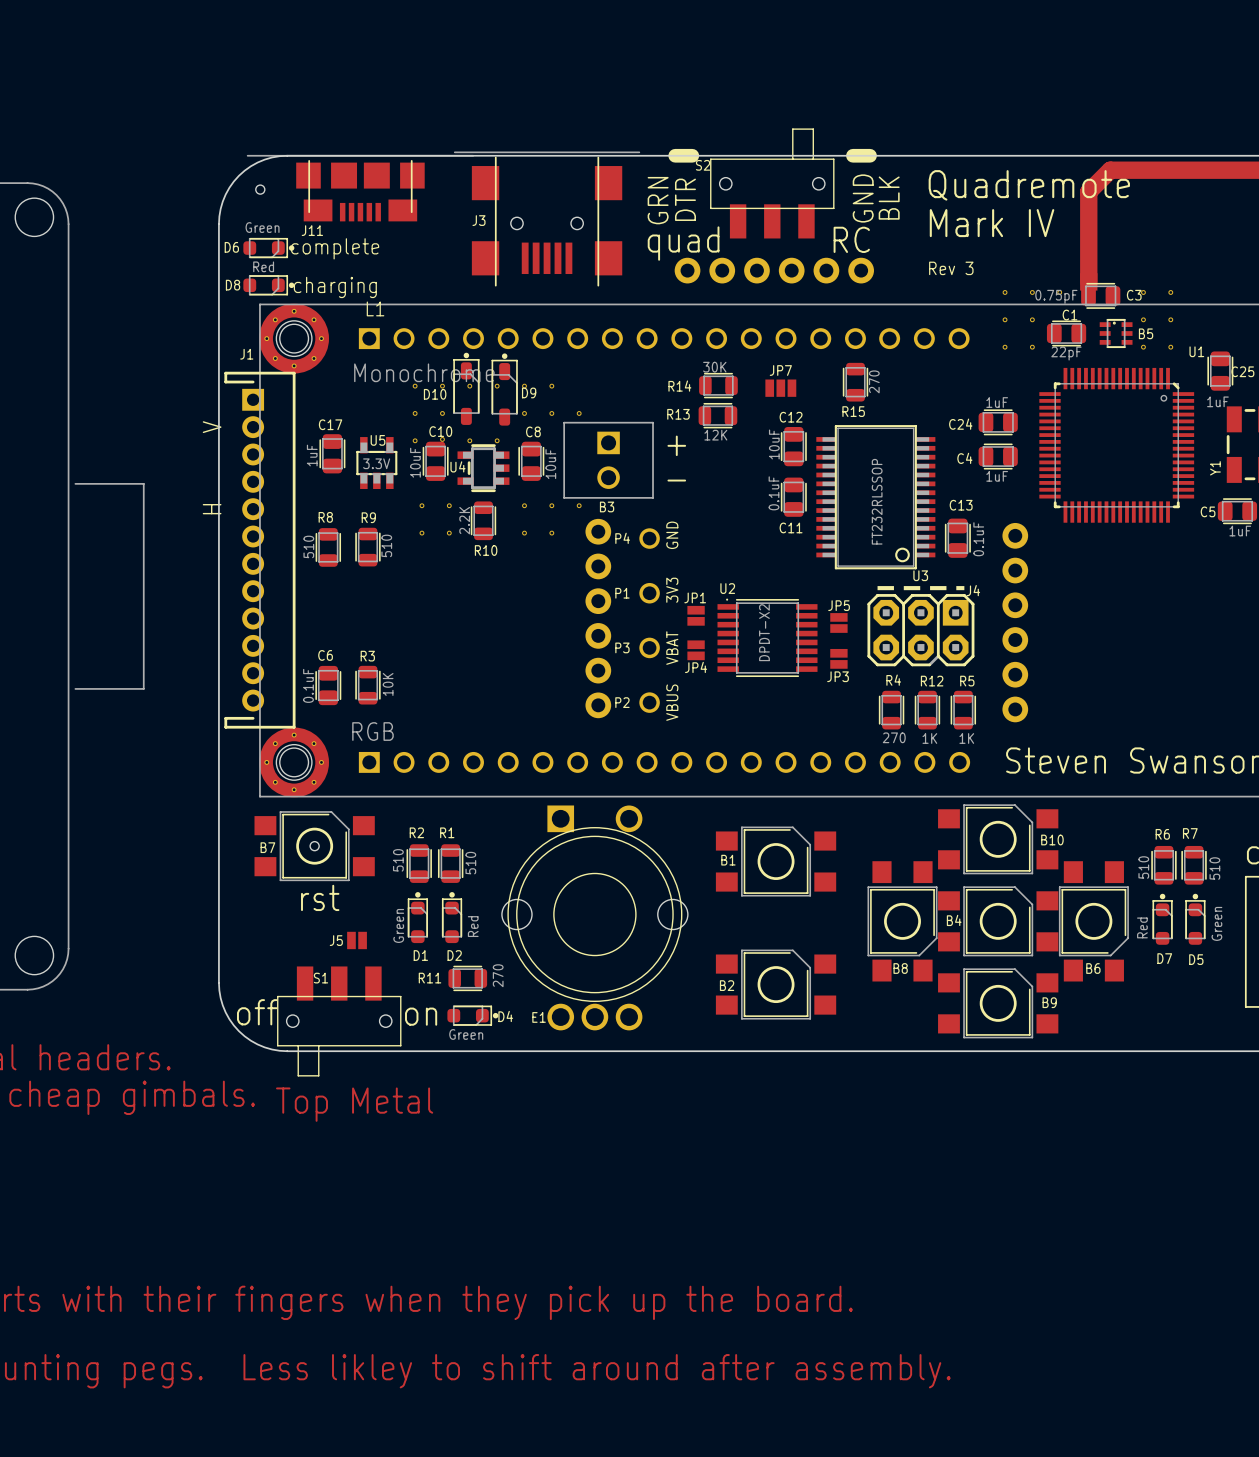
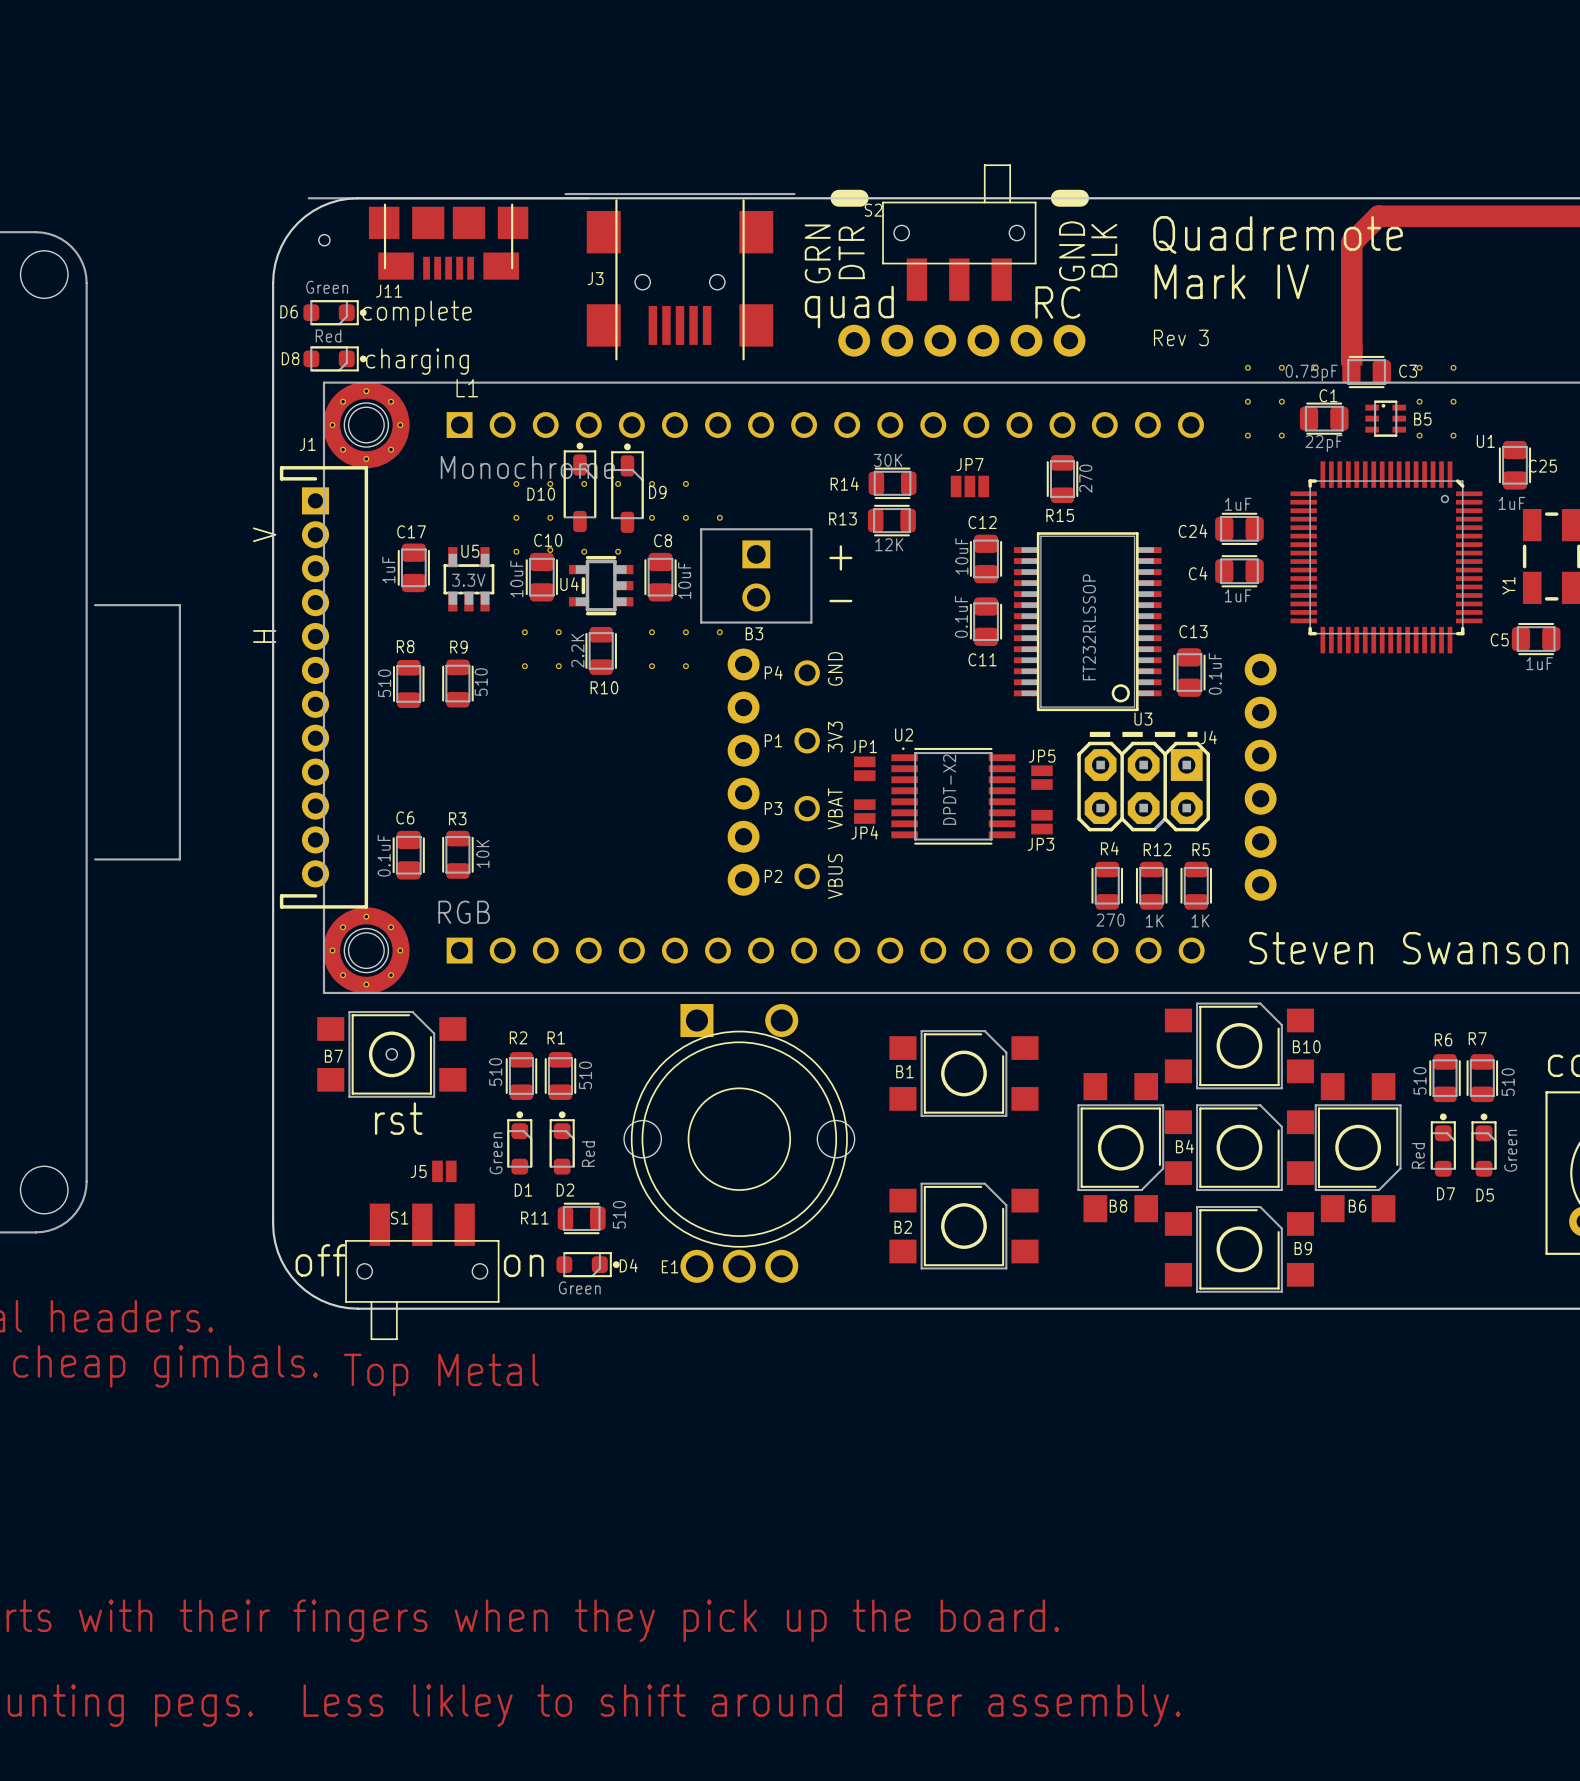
R11 value: 270 (498, 975) -> 510 (619, 1214)

